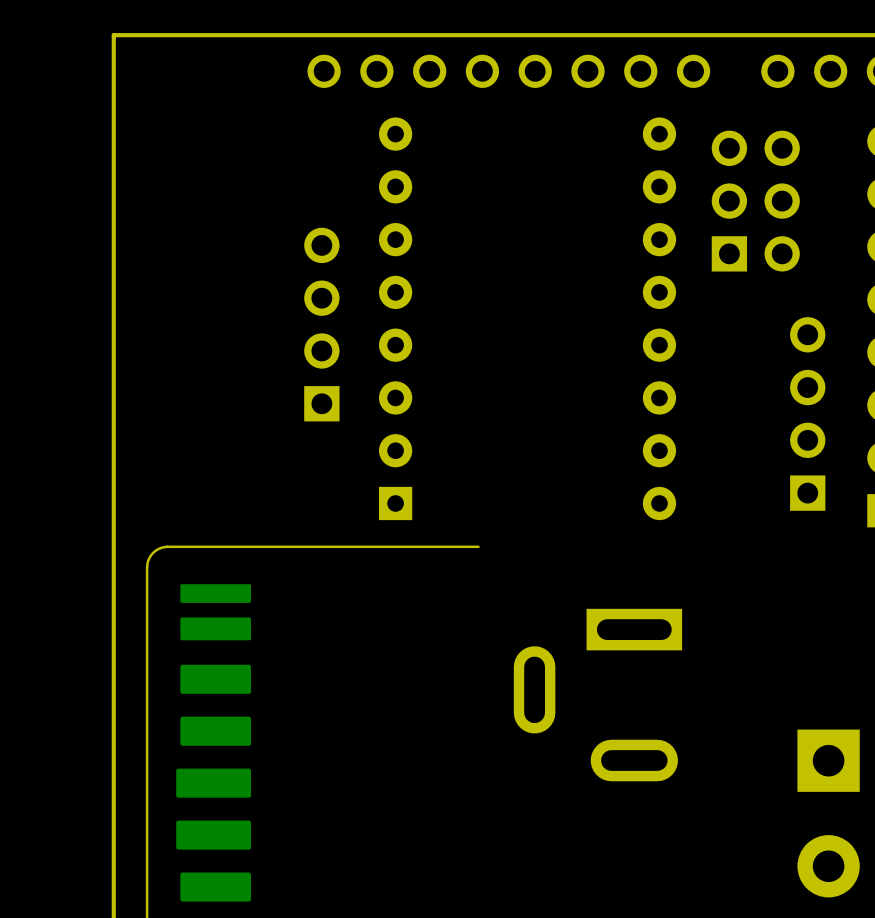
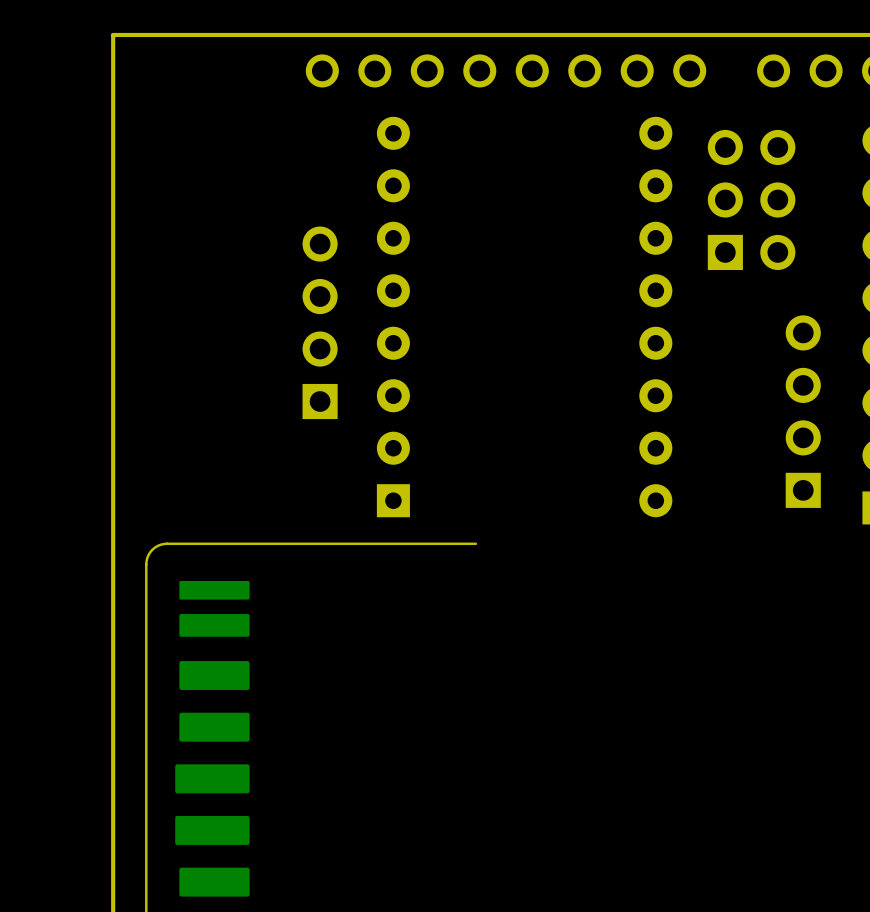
part: (597, 695) -> none
part: (828, 813) -> none

